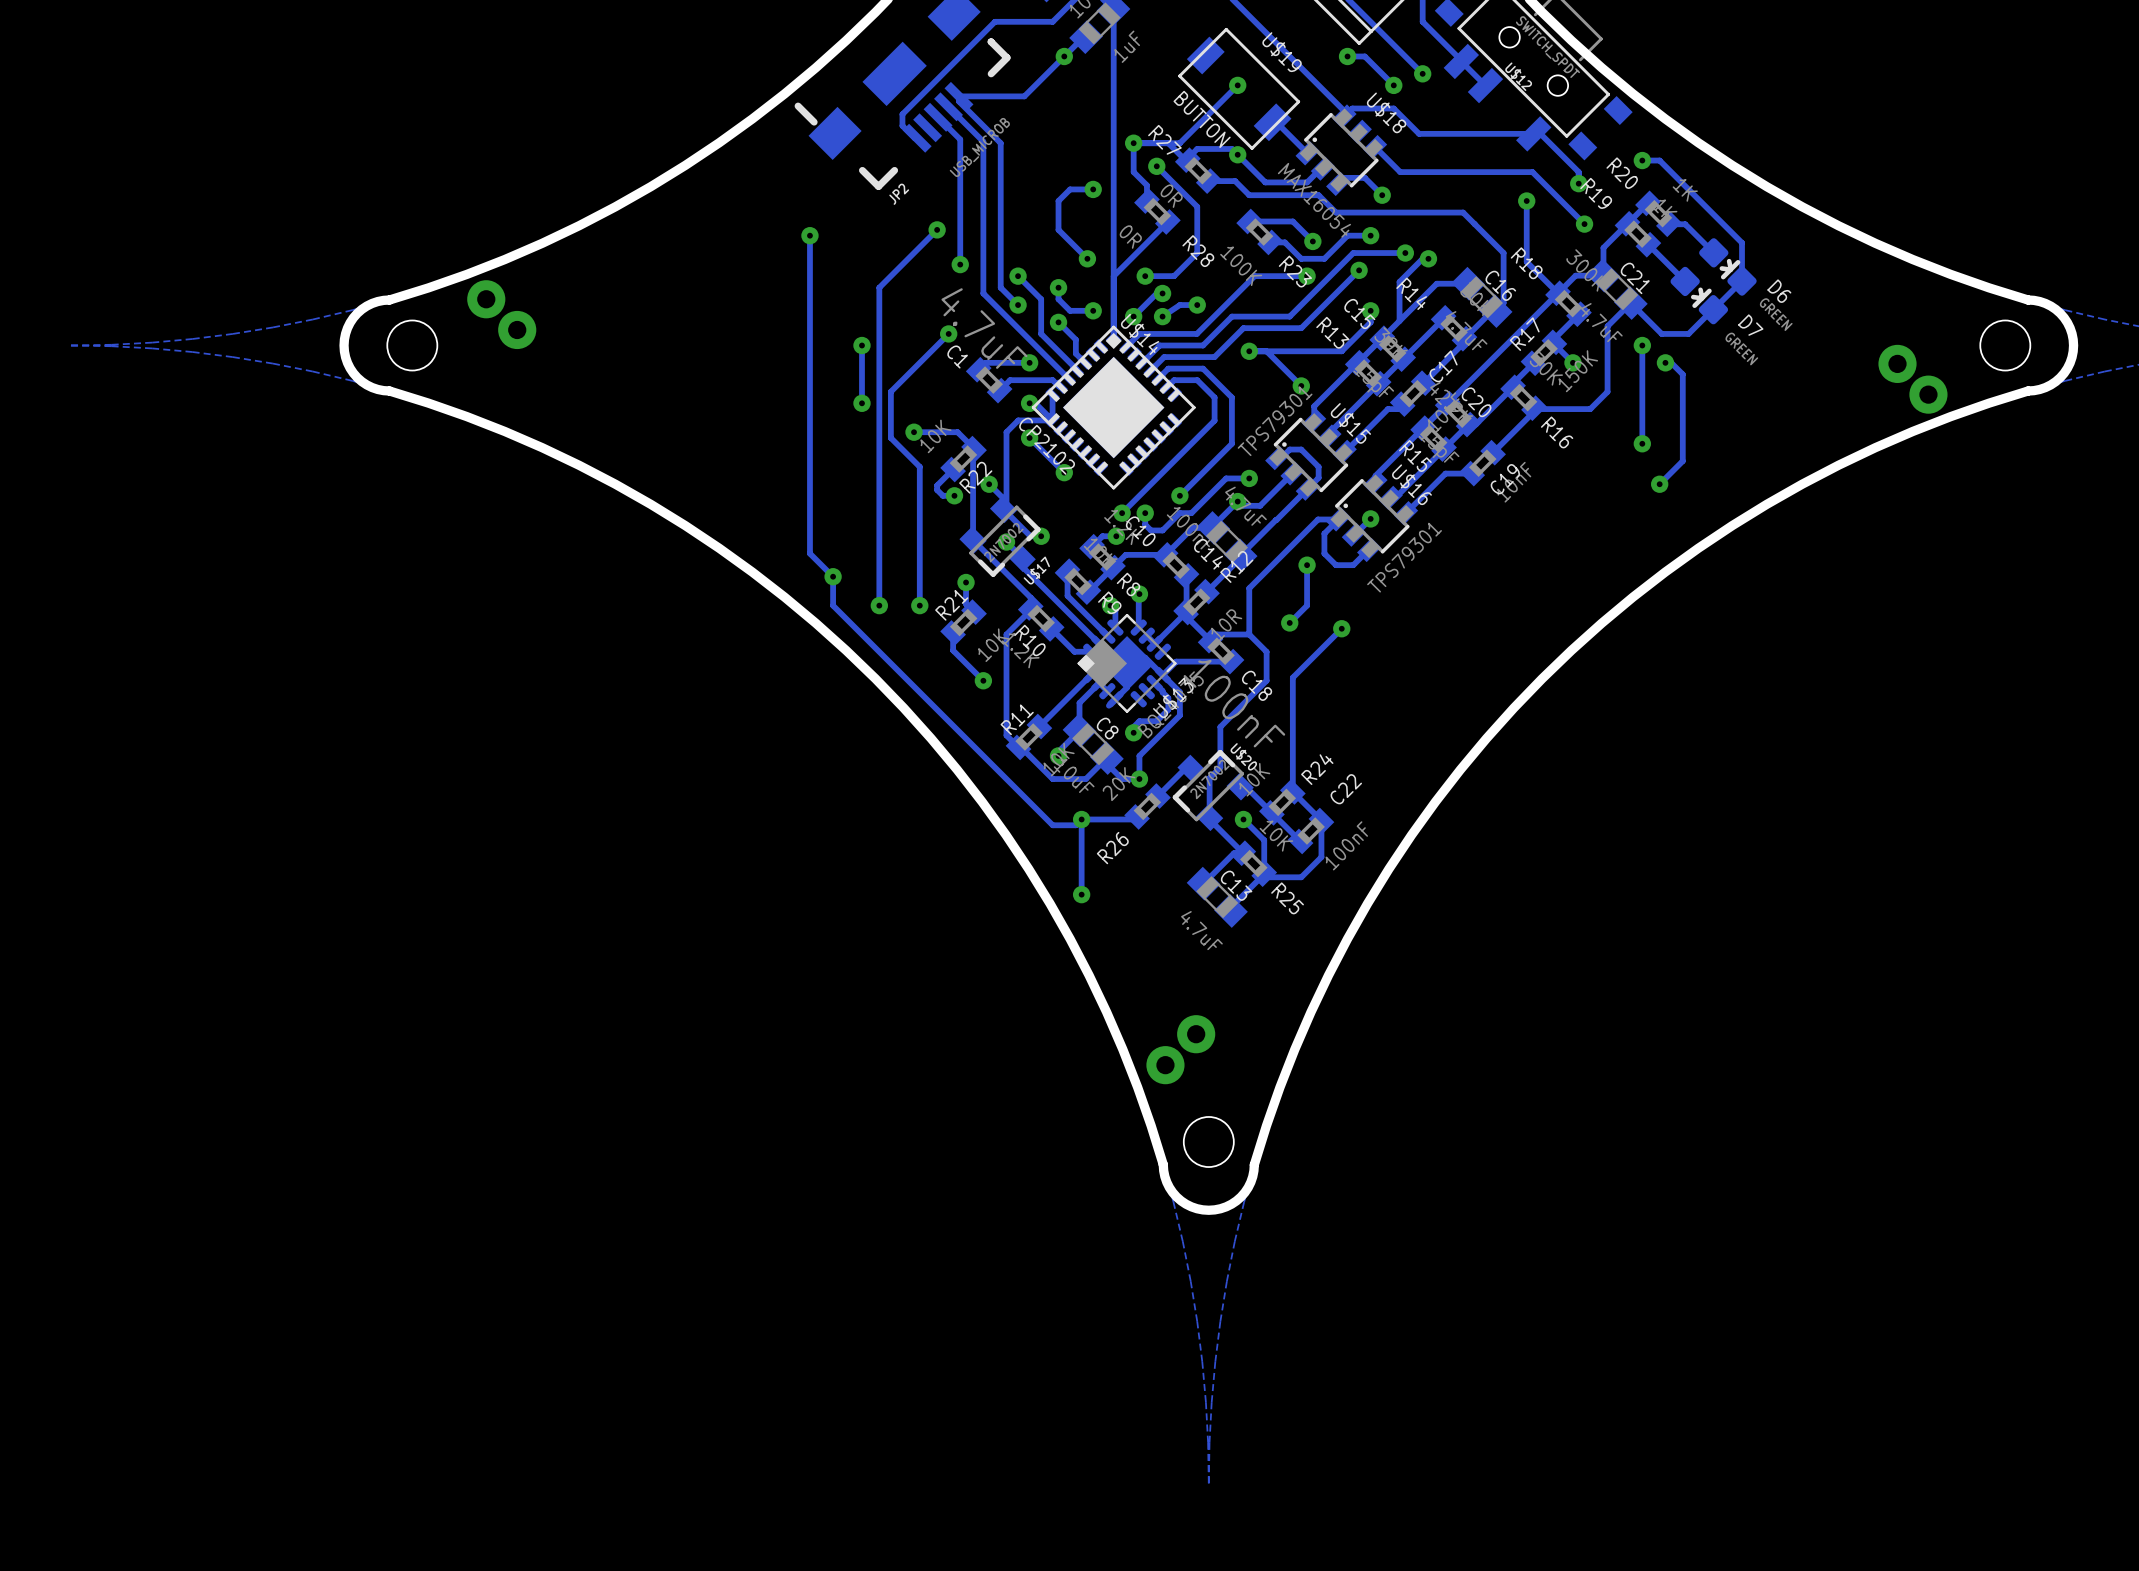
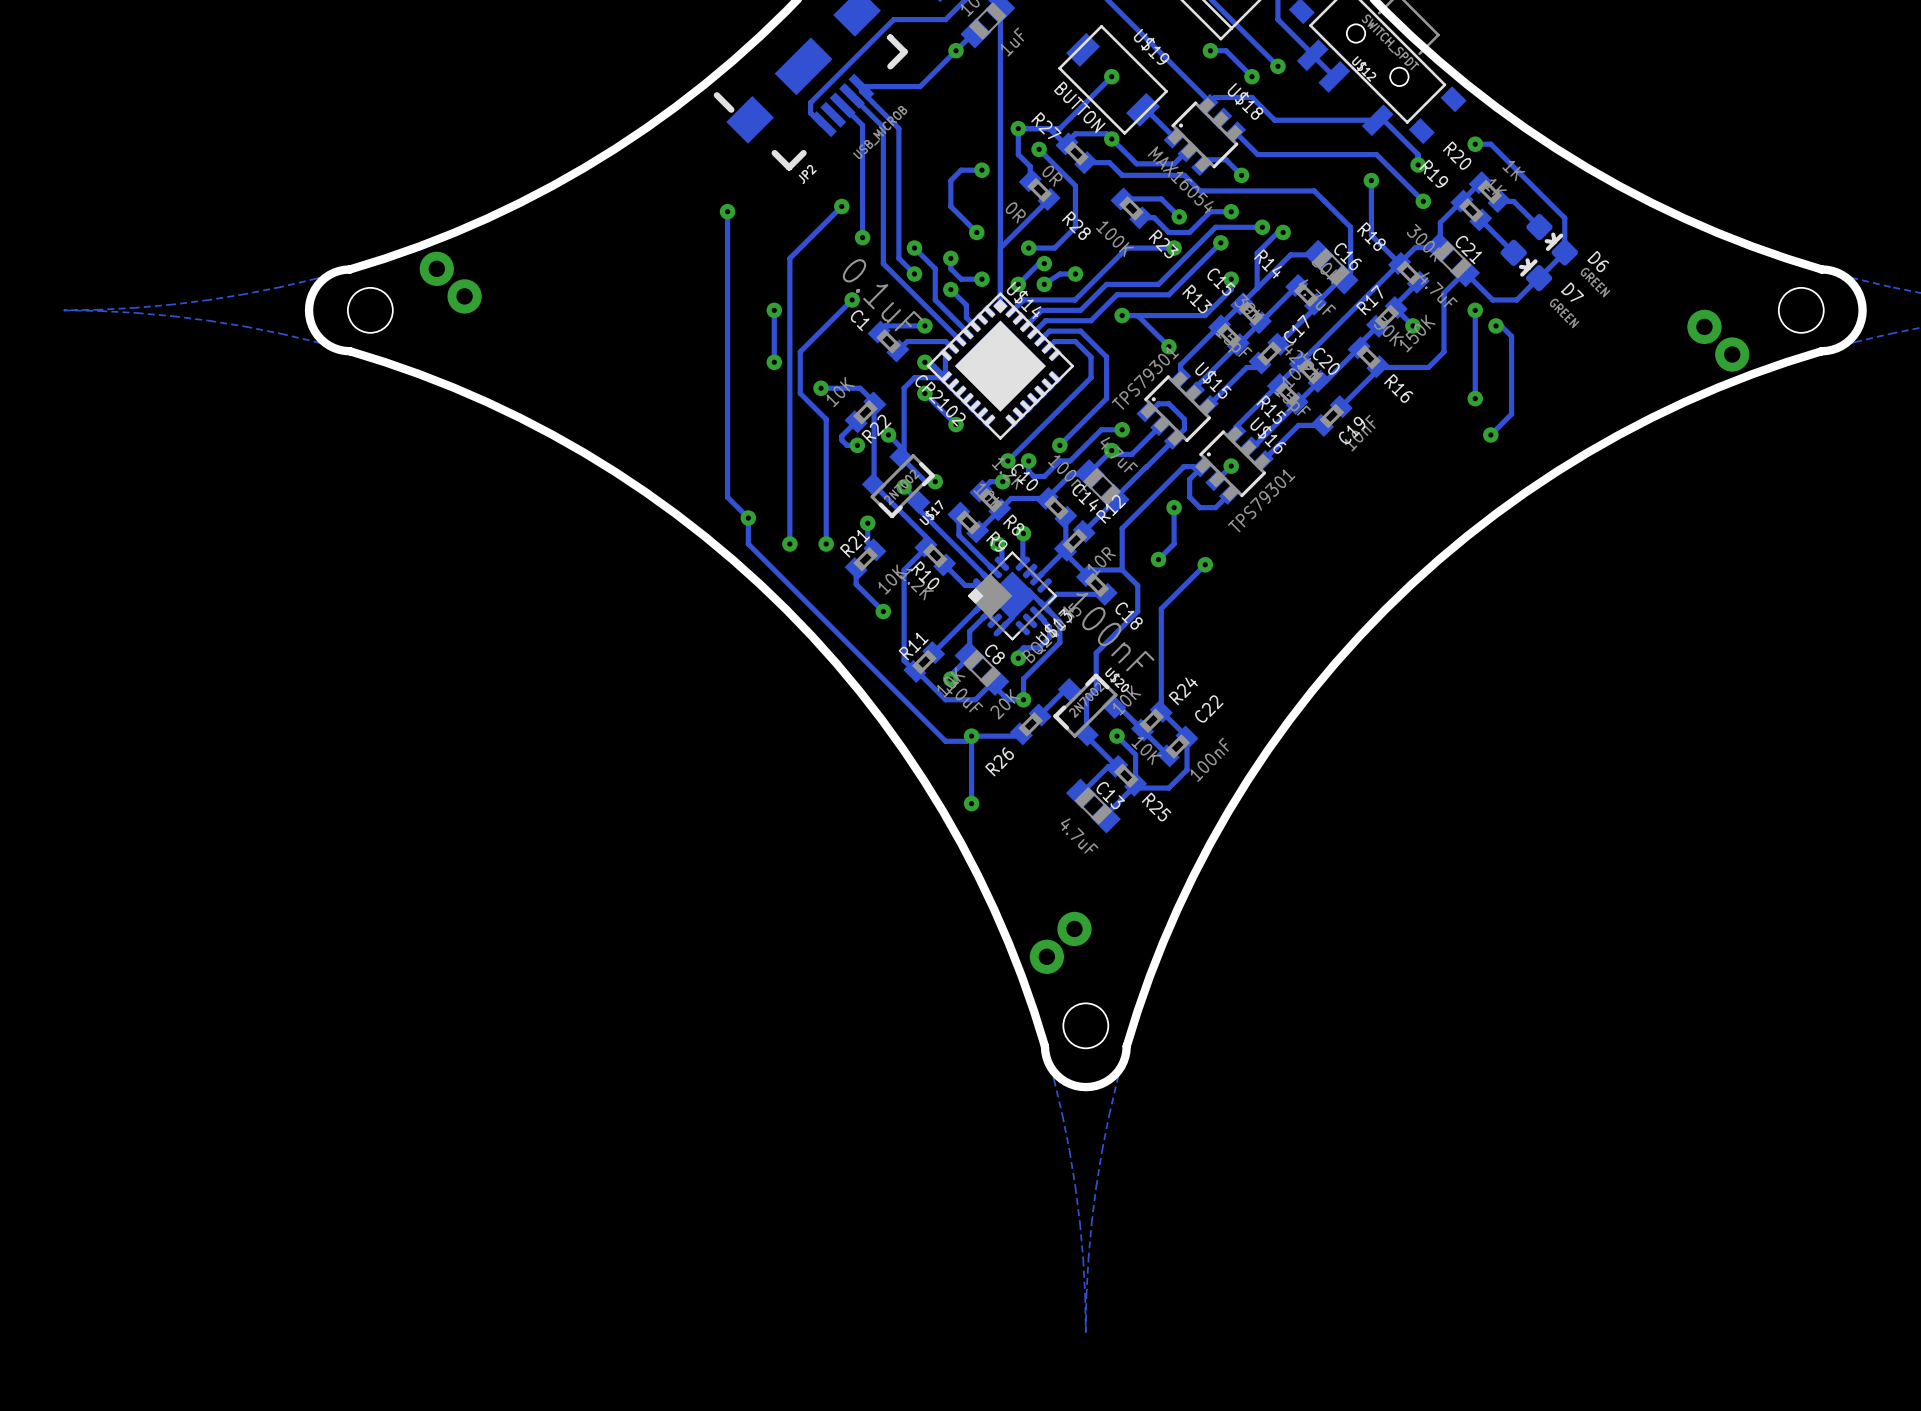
C1 value: 4.7uF (984, 328) -> 0.1uF (882, 295)

